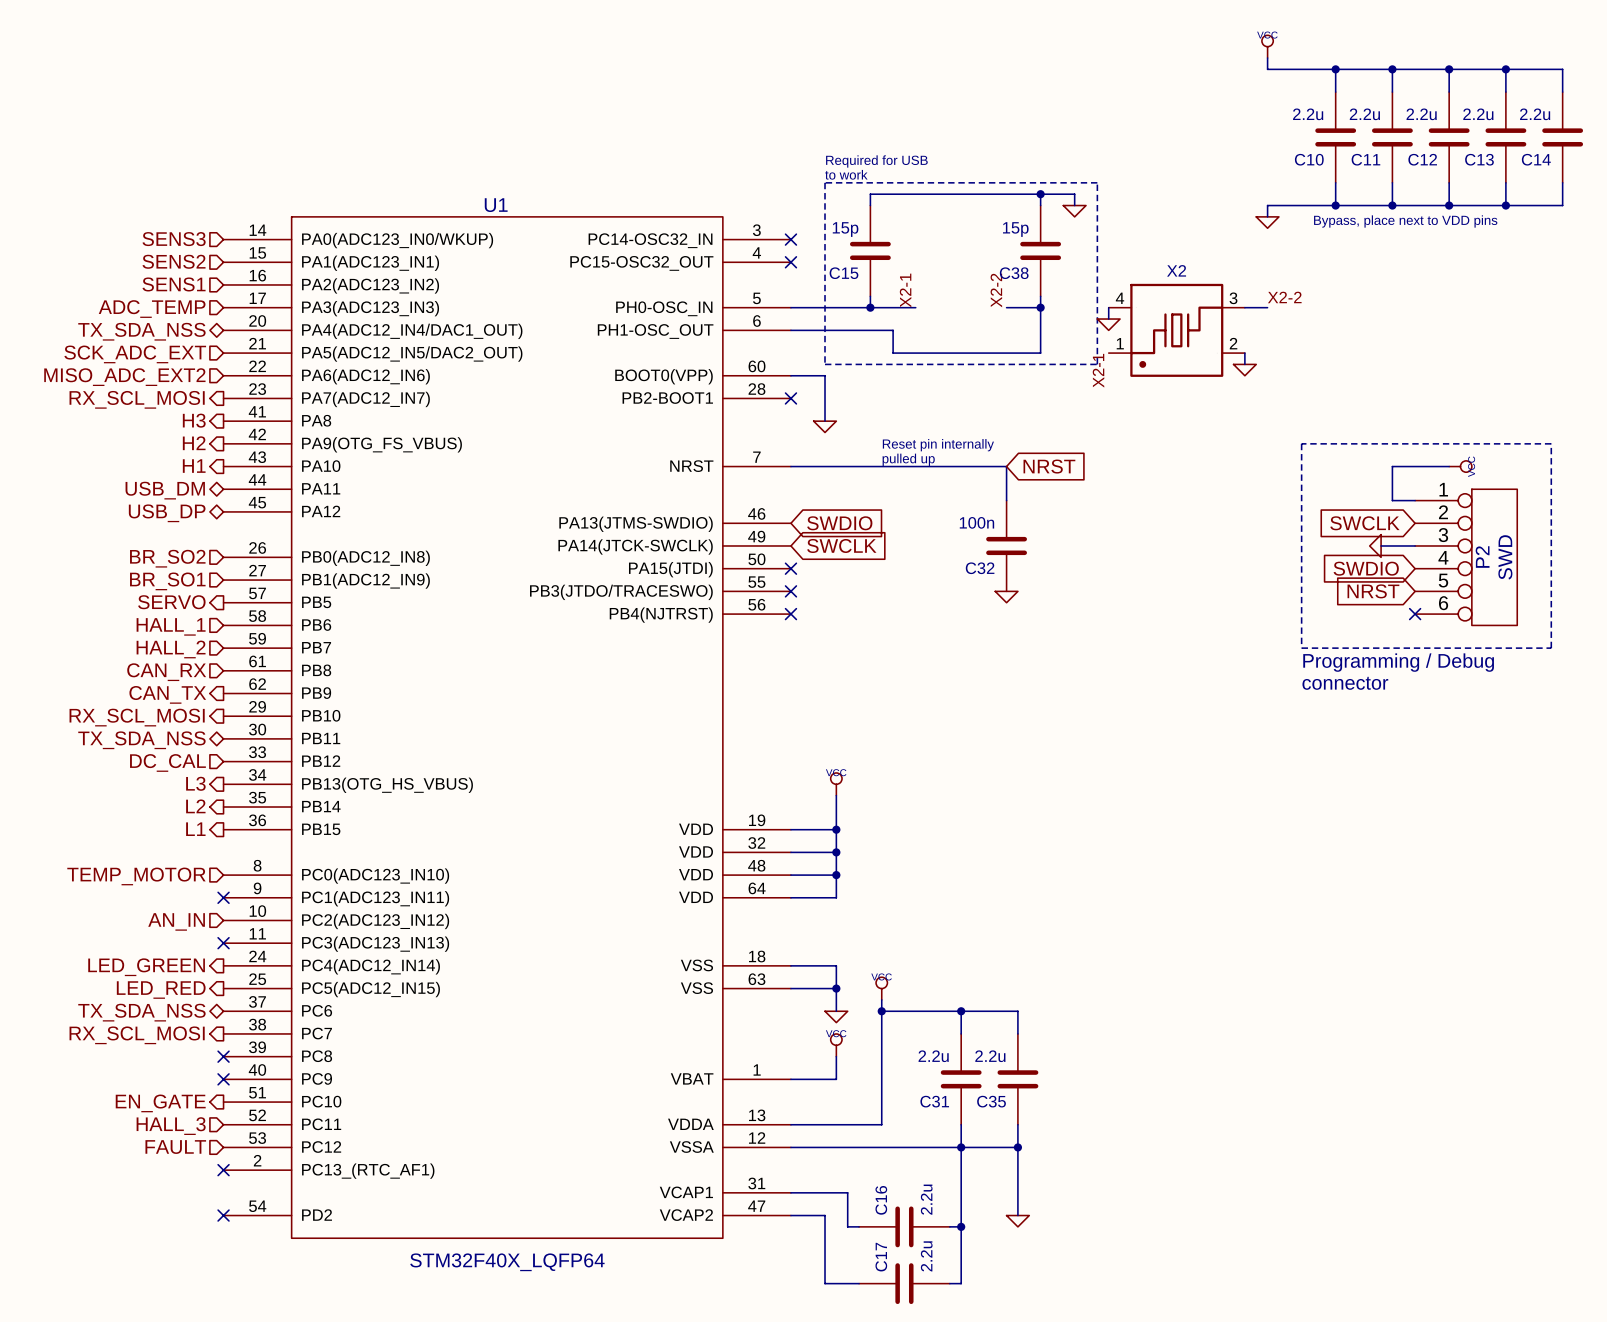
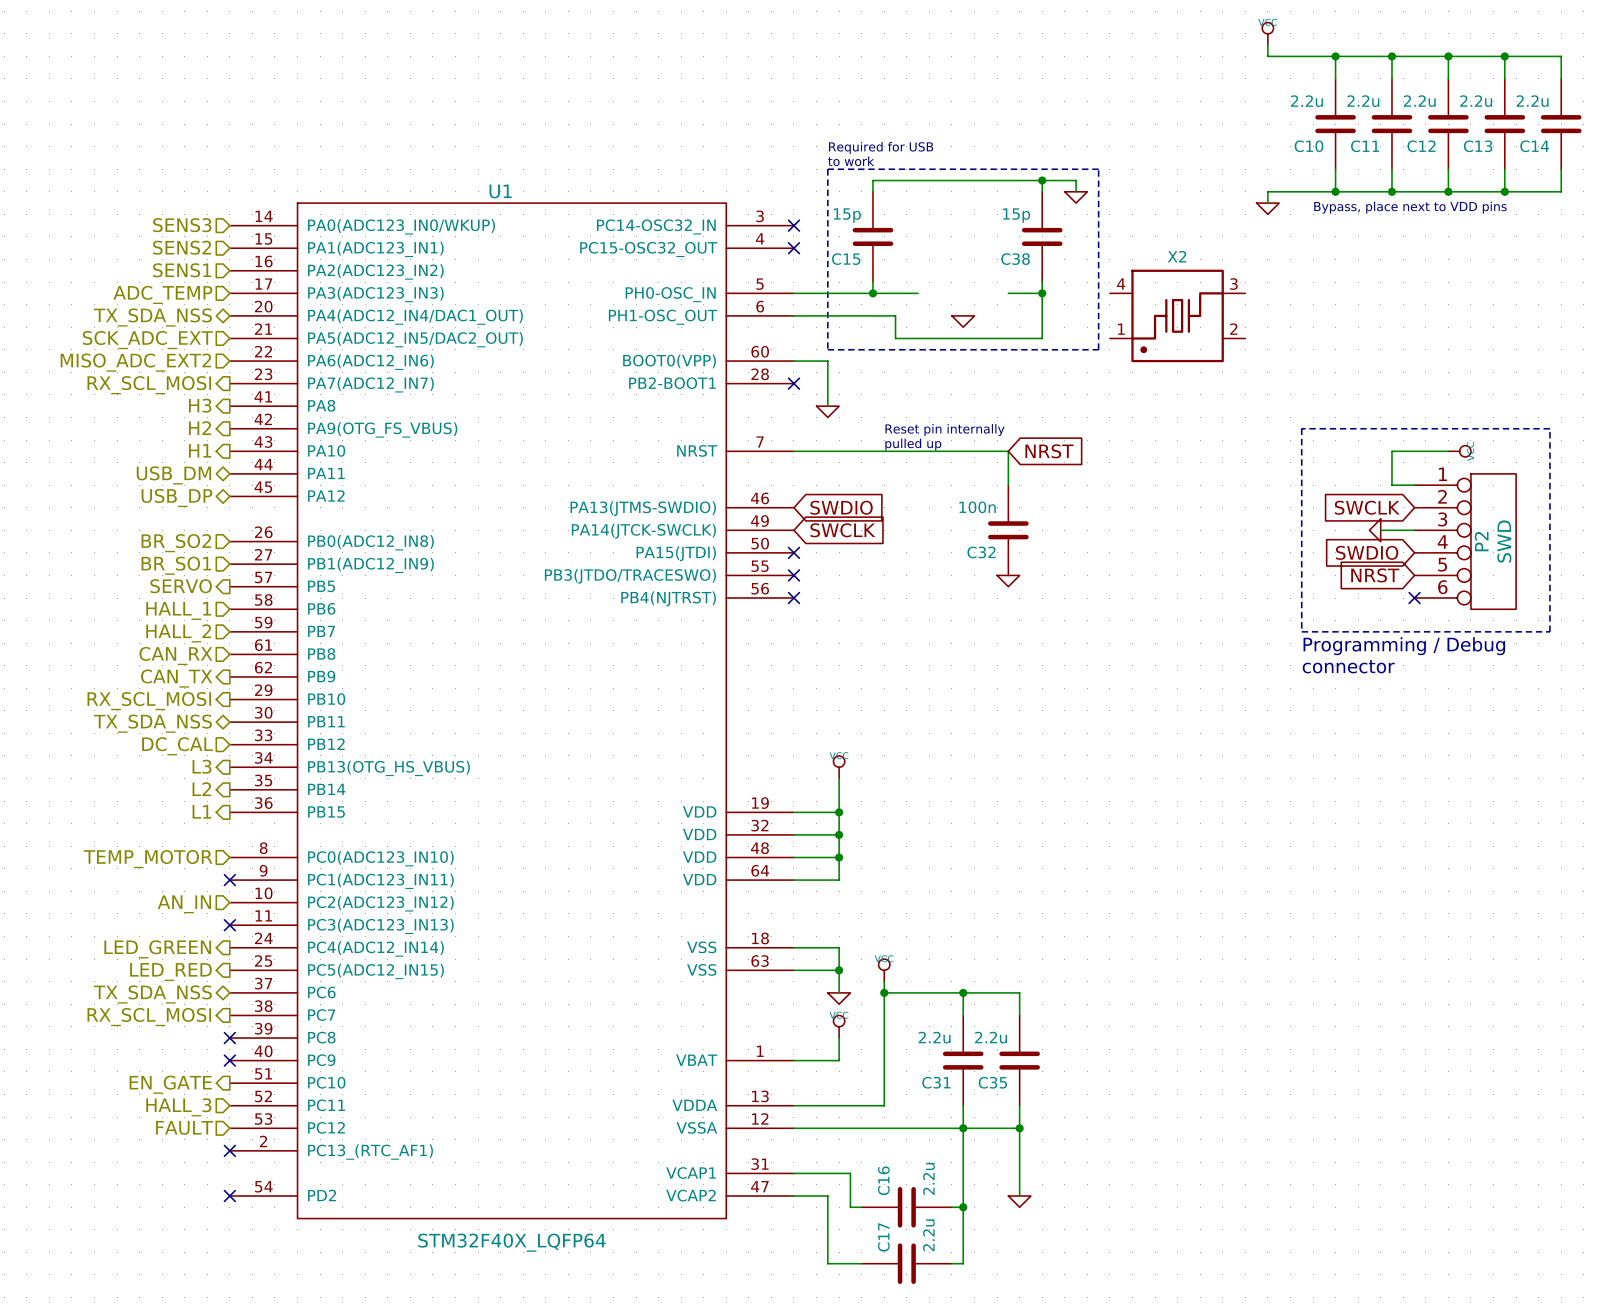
label: X2-1 (905, 290) -> none
label: X2-2 (996, 290) -> none
label: X2-2 (1284, 297) -> none
wire: (1108, 307) (1108, 319) -> none
wire: (1244, 307) (1267, 307) -> none
power symbol: (1108, 324) -> none
power symbol: none -> (963, 321)
wire: (1244, 353) (1244, 364) -> none
label: X2-1 (1098, 370) -> none
power symbol: (1244, 370) -> none

